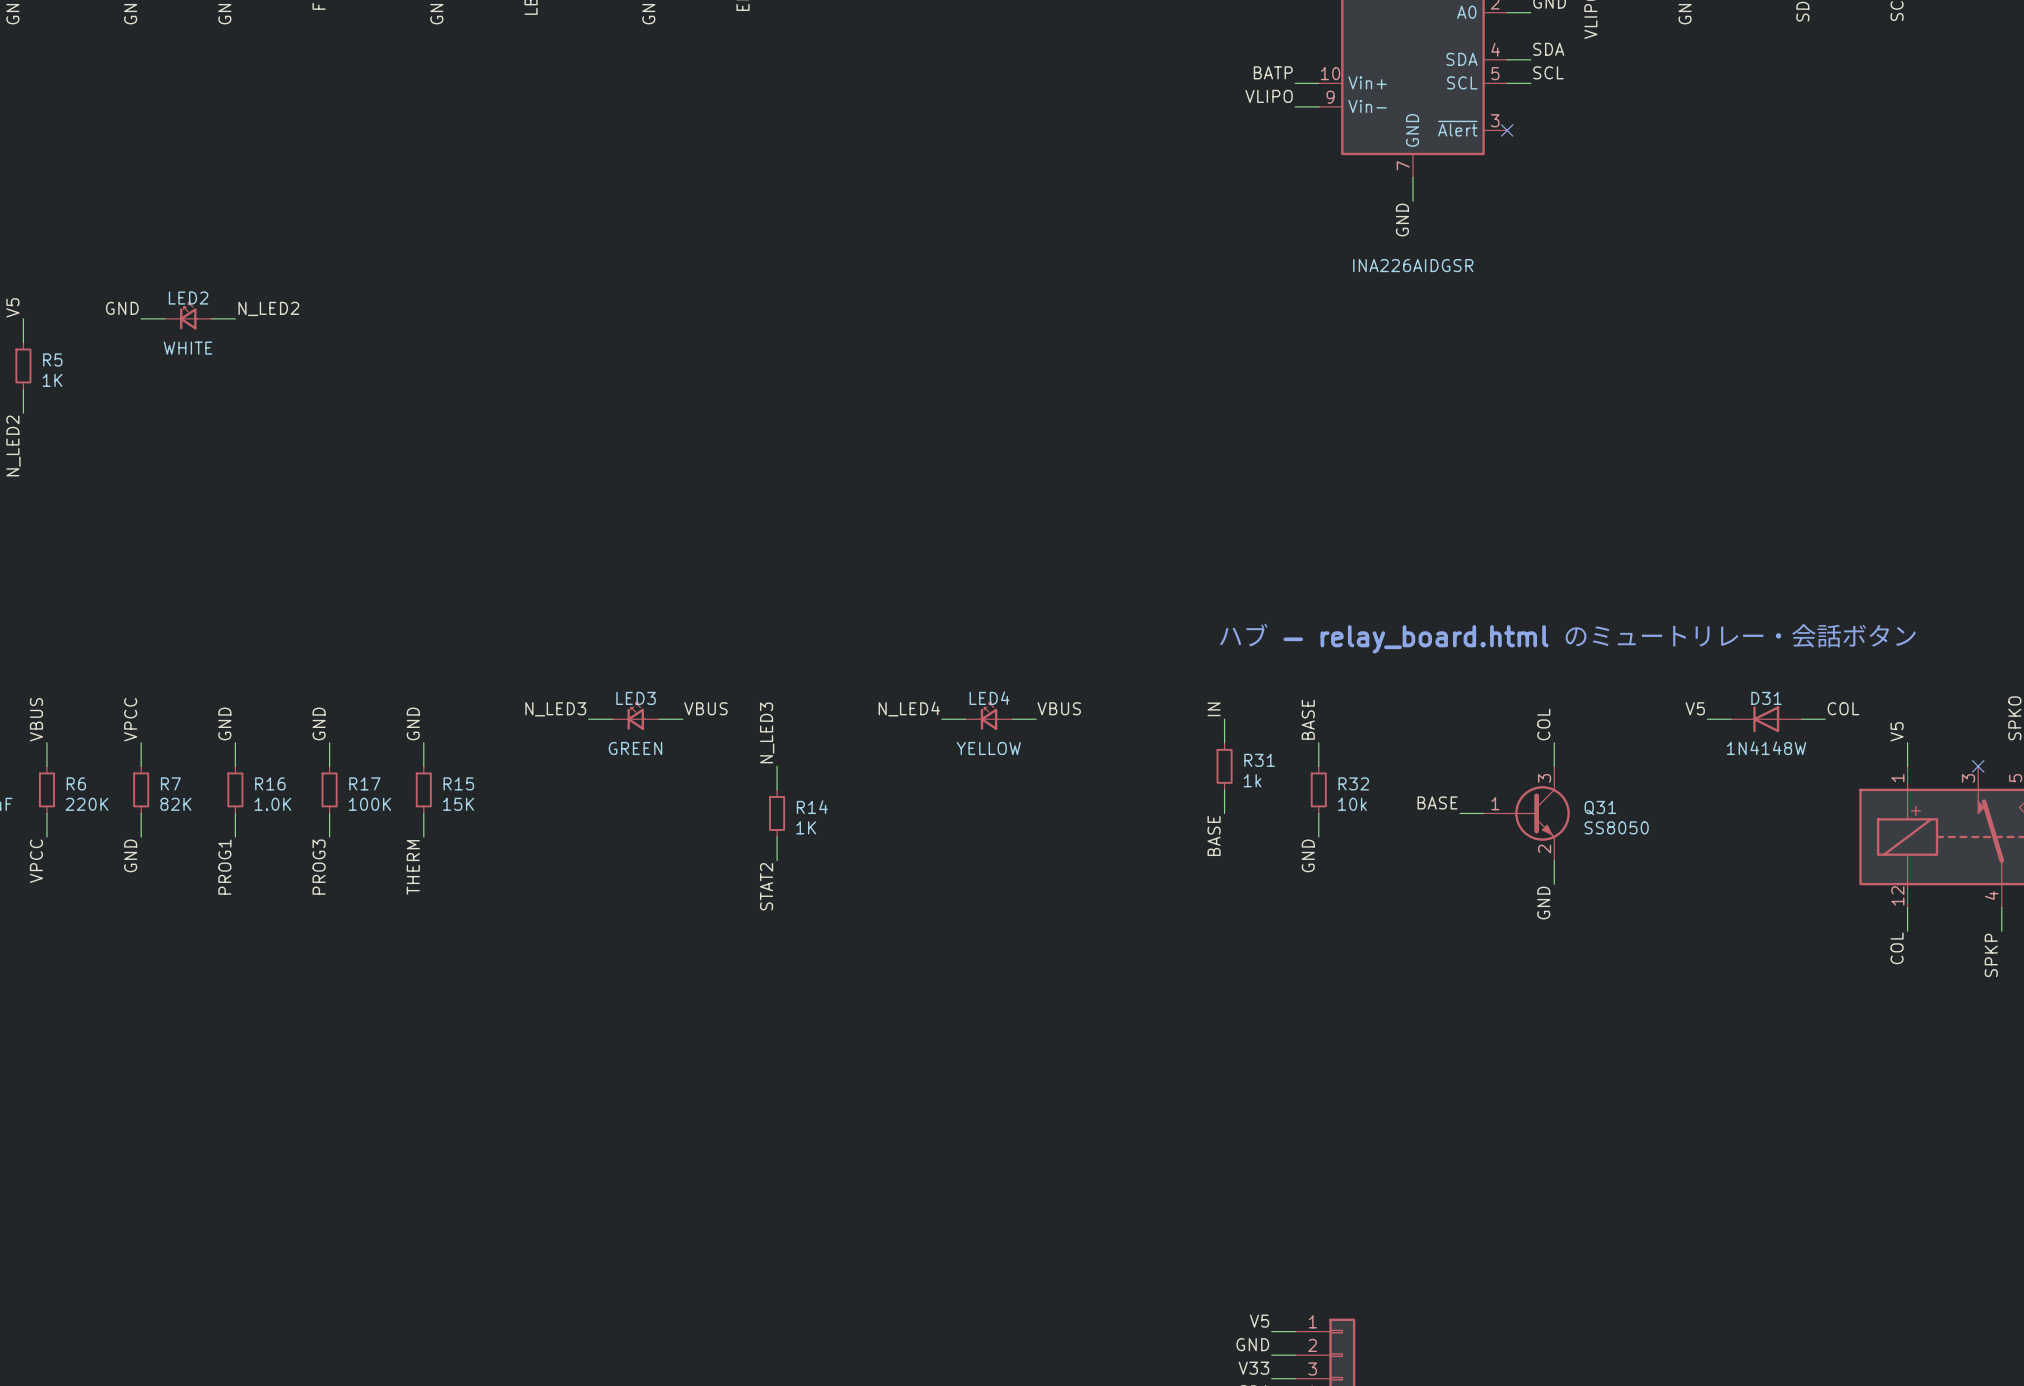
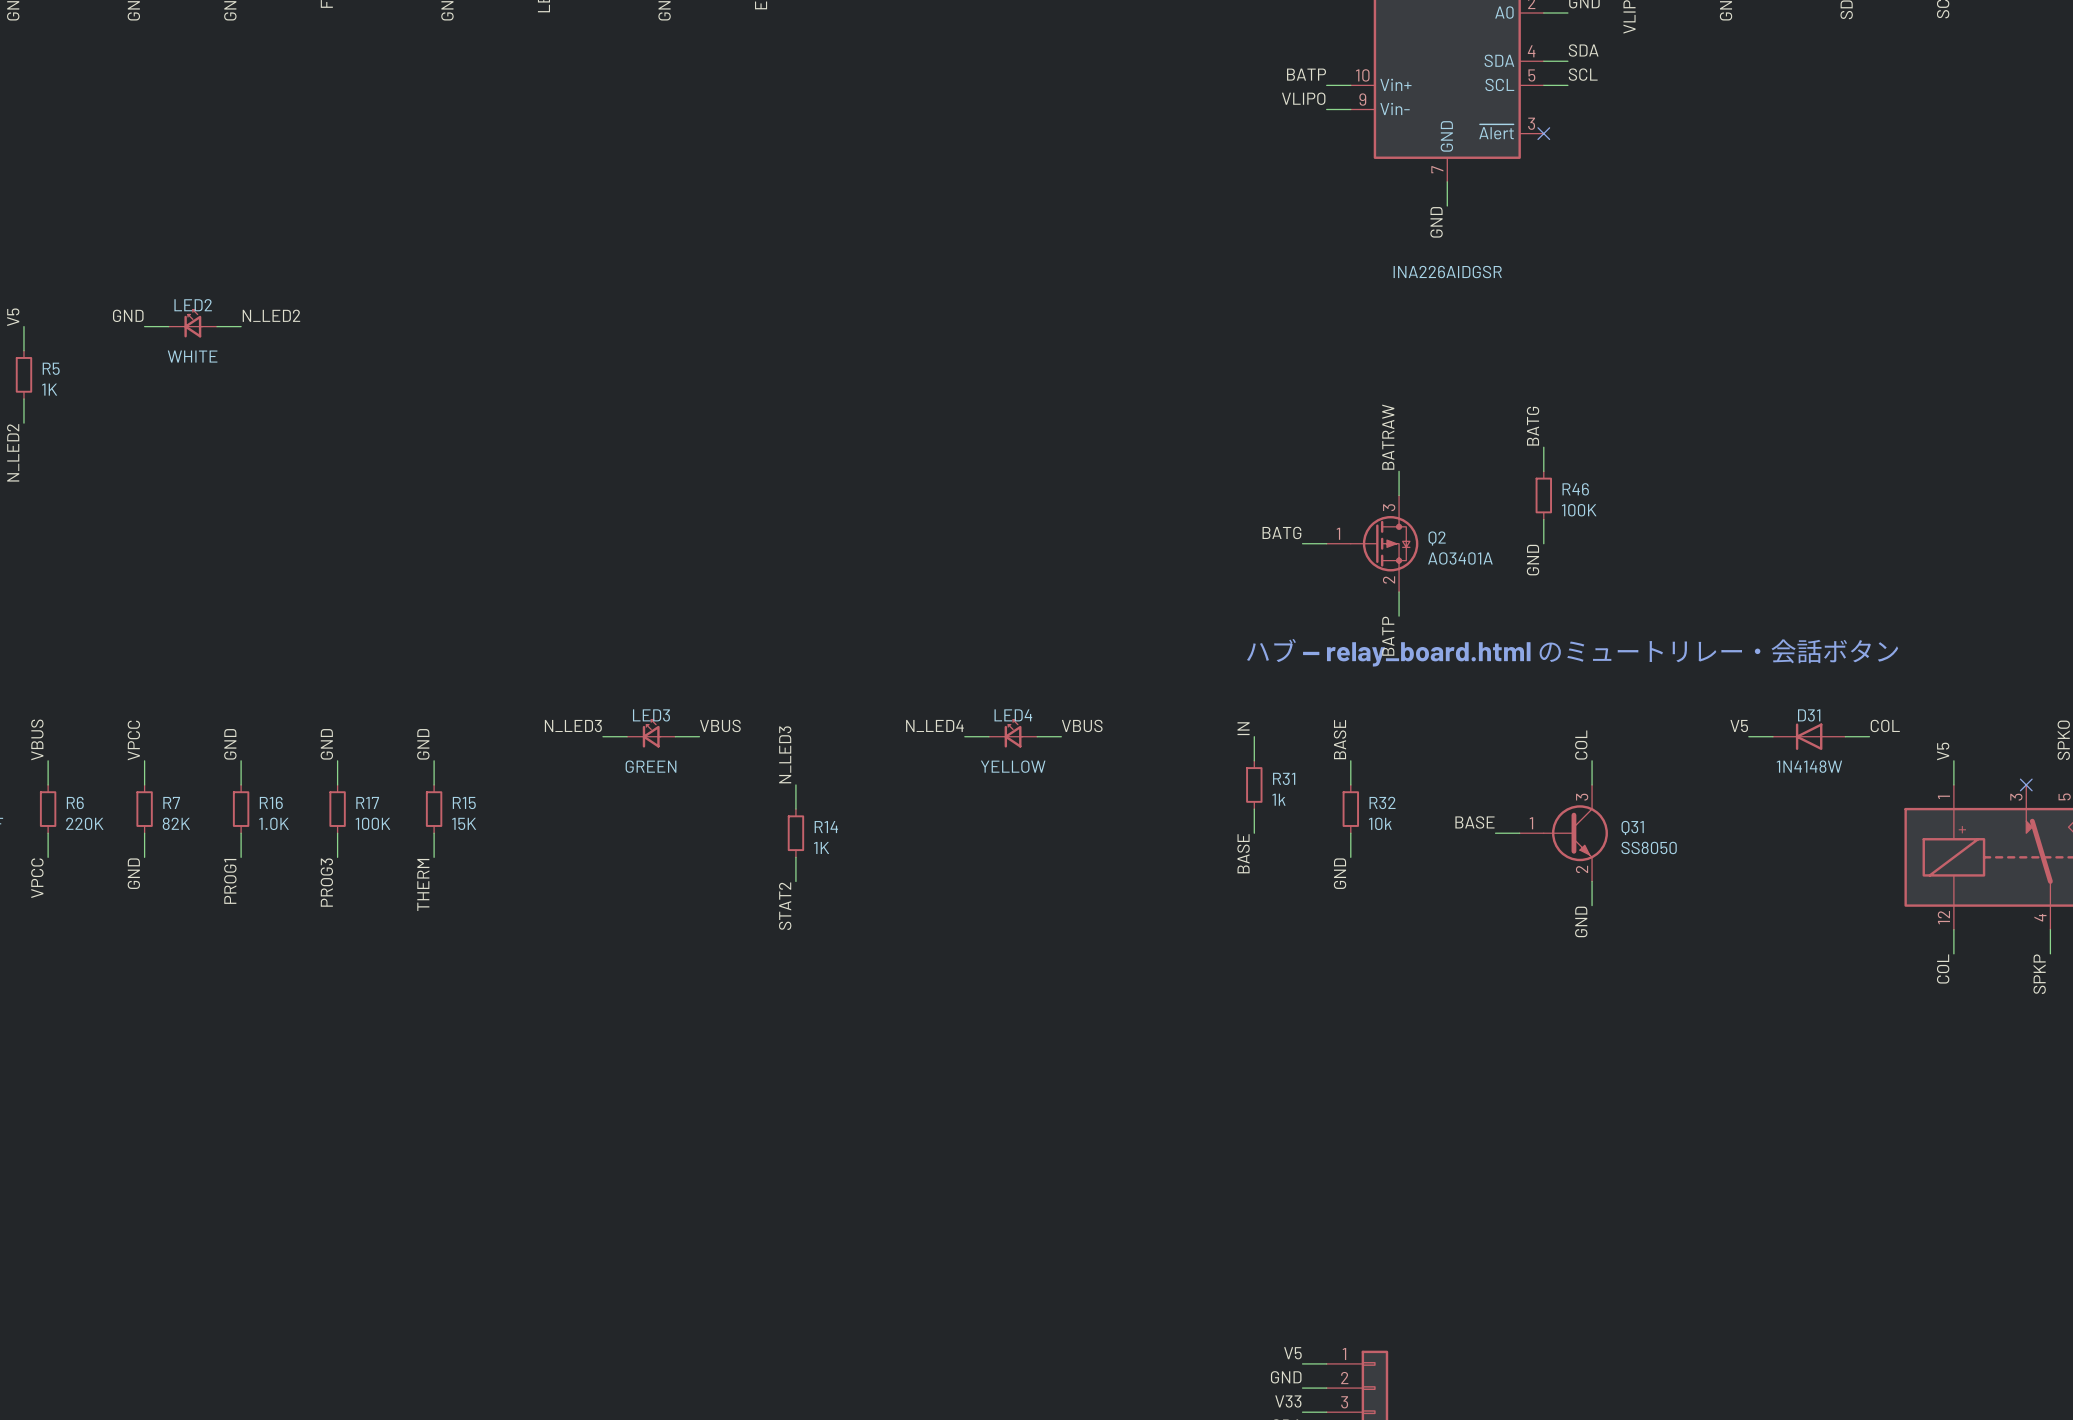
label: none -> BATG (1533, 426)
label: none -> BATRAW (1388, 437)
wire: none -> (1543, 447) (1543, 471)
wire: none -> (1399, 471) (1399, 495)
R46: none -> 100K (1543, 495)
wire: none -> (1543, 519) (1543, 543)
label: none -> BATG (1281, 532)
wire: none -> (1302, 543) (1326, 543)
Q2: none -> AO3401A (1372, 543)
label: none -> GND (1533, 560)
wire: none -> (1399, 591) (1399, 616)
label: none -> BATP (1388, 636)

